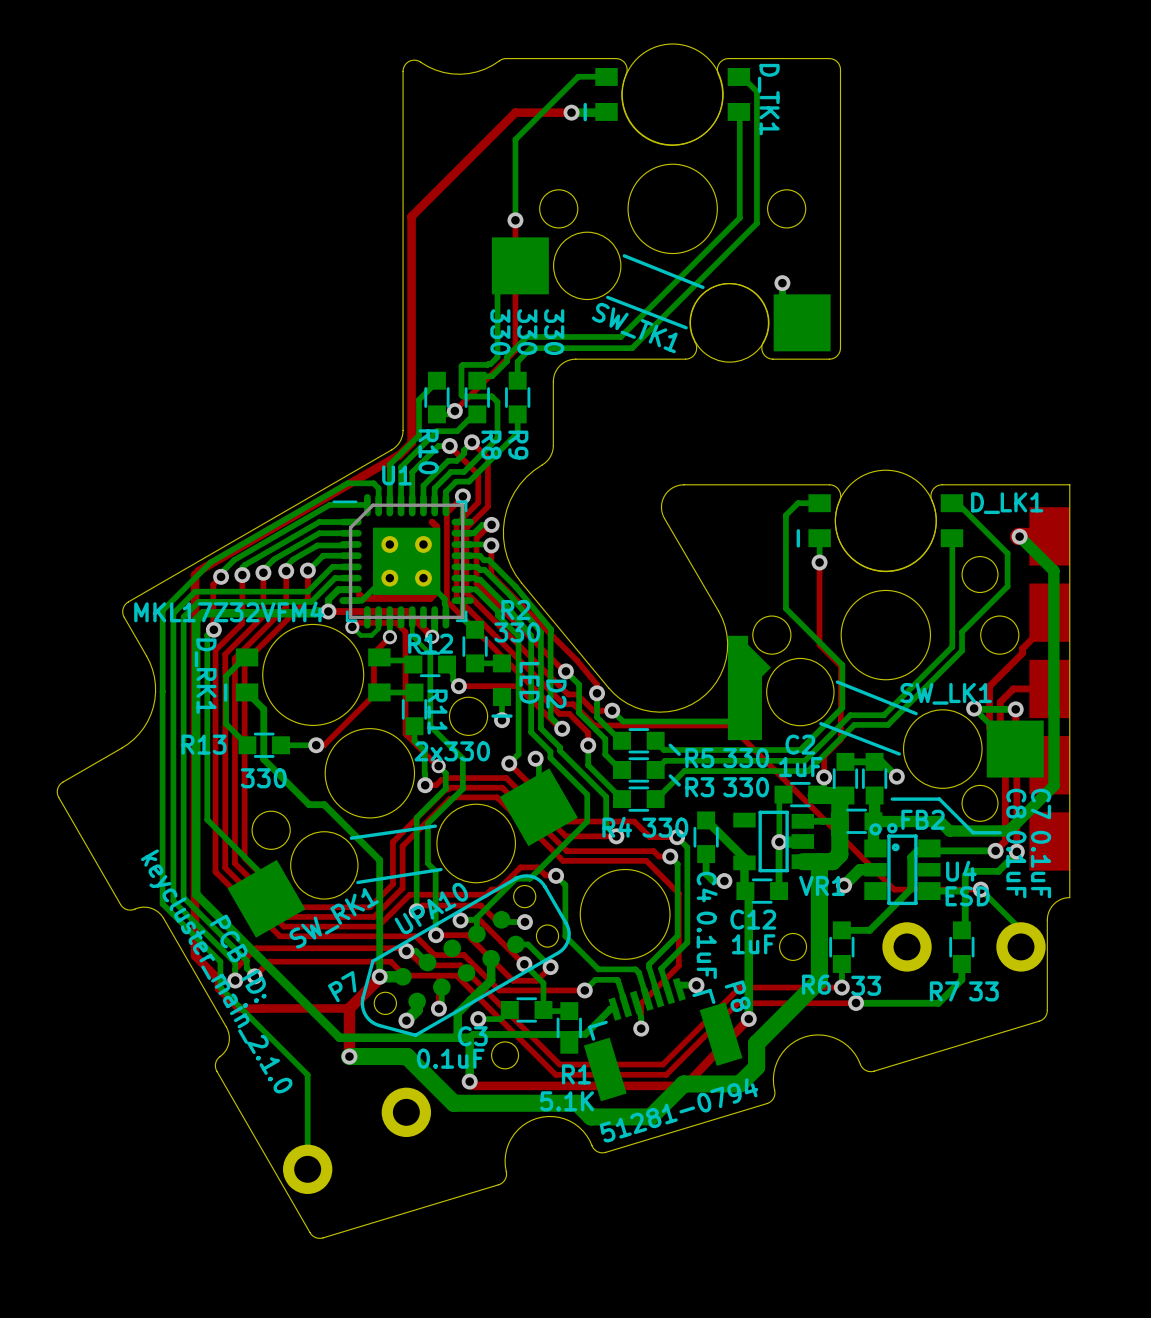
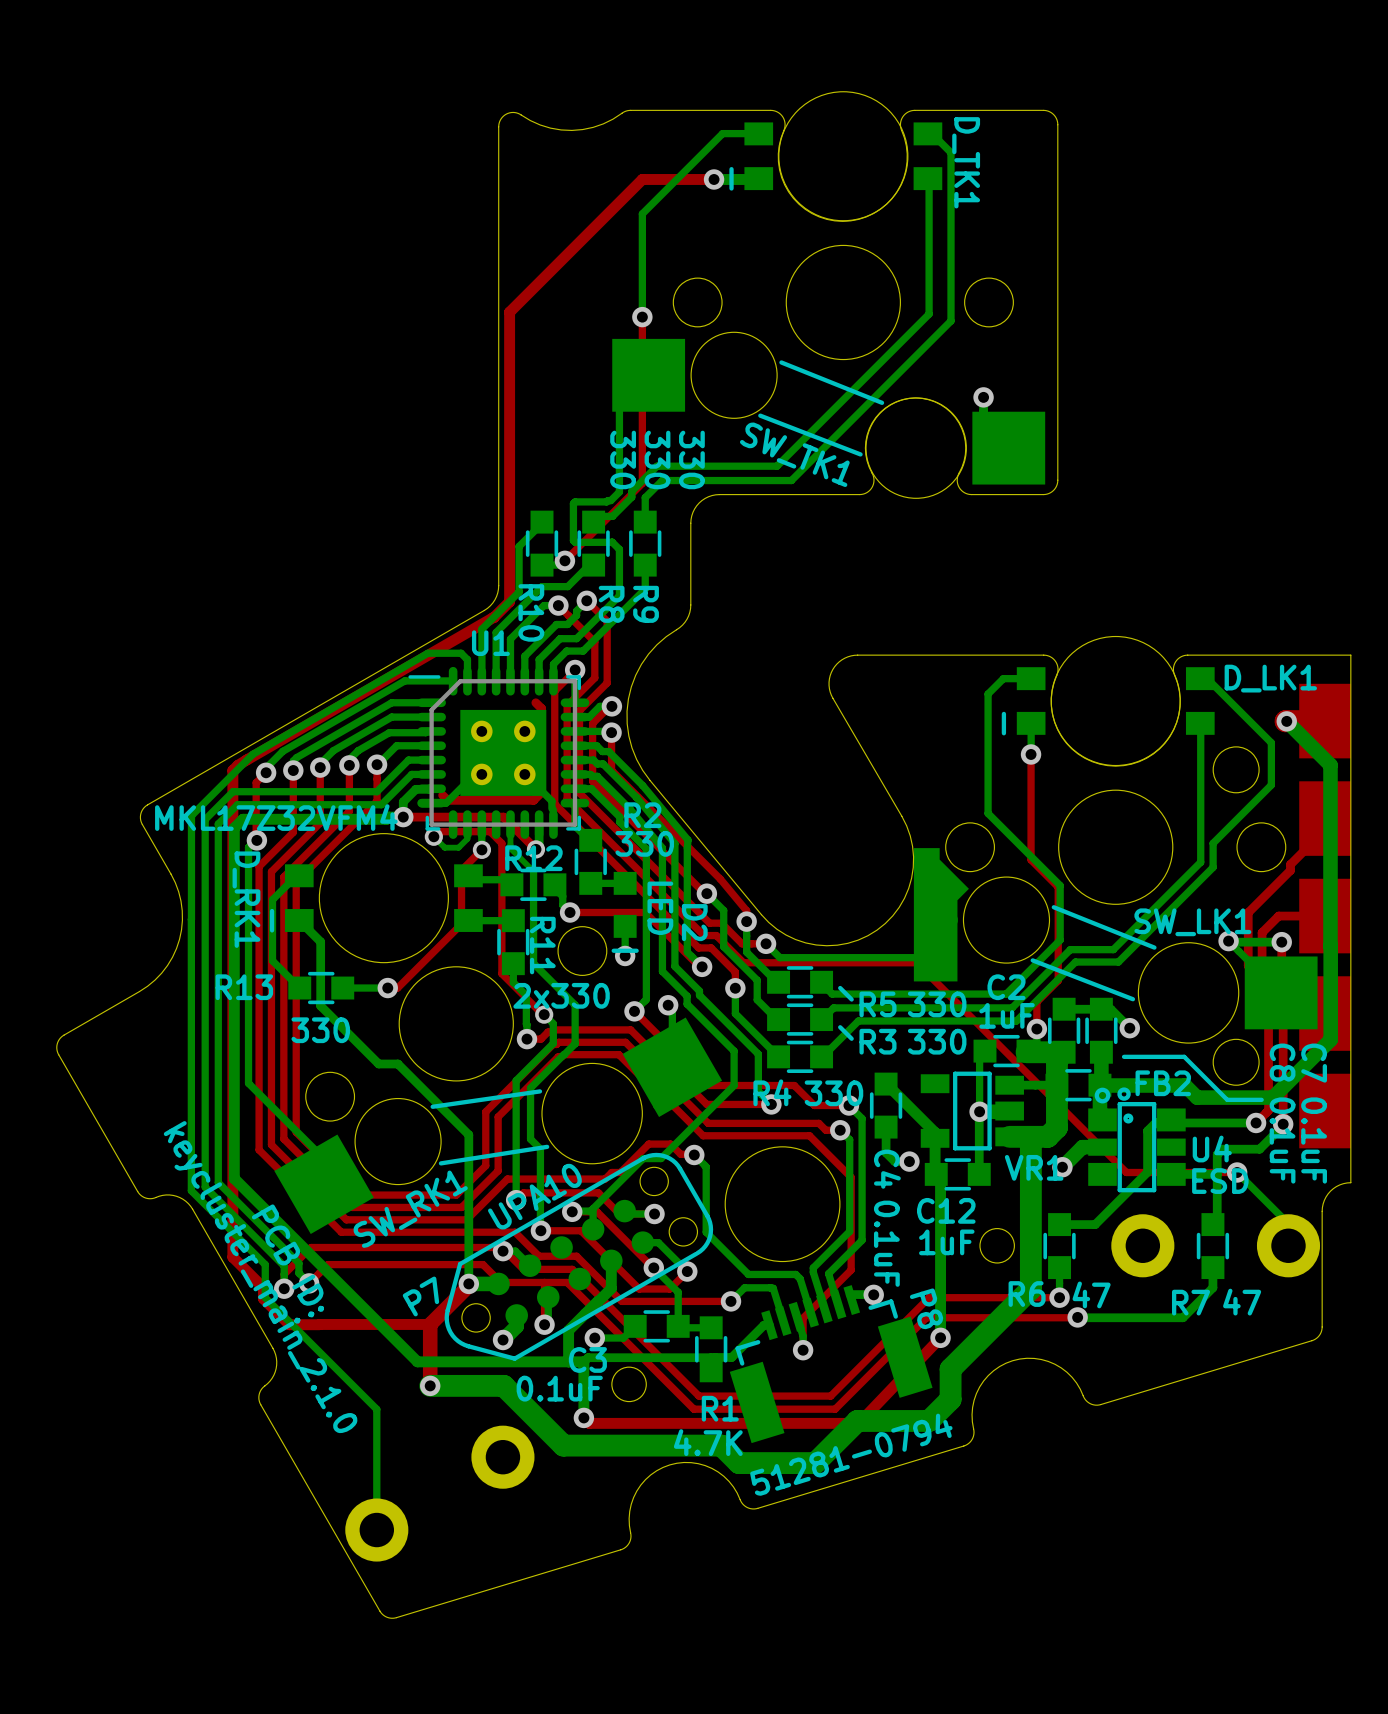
R6 value: 33 (866, 985) -> 47 (1091, 1294)
R7 value: 33 (983, 991) -> 47 (1242, 1302)
R1 value: 5.1K (567, 1101) -> 4.7K (708, 1442)

